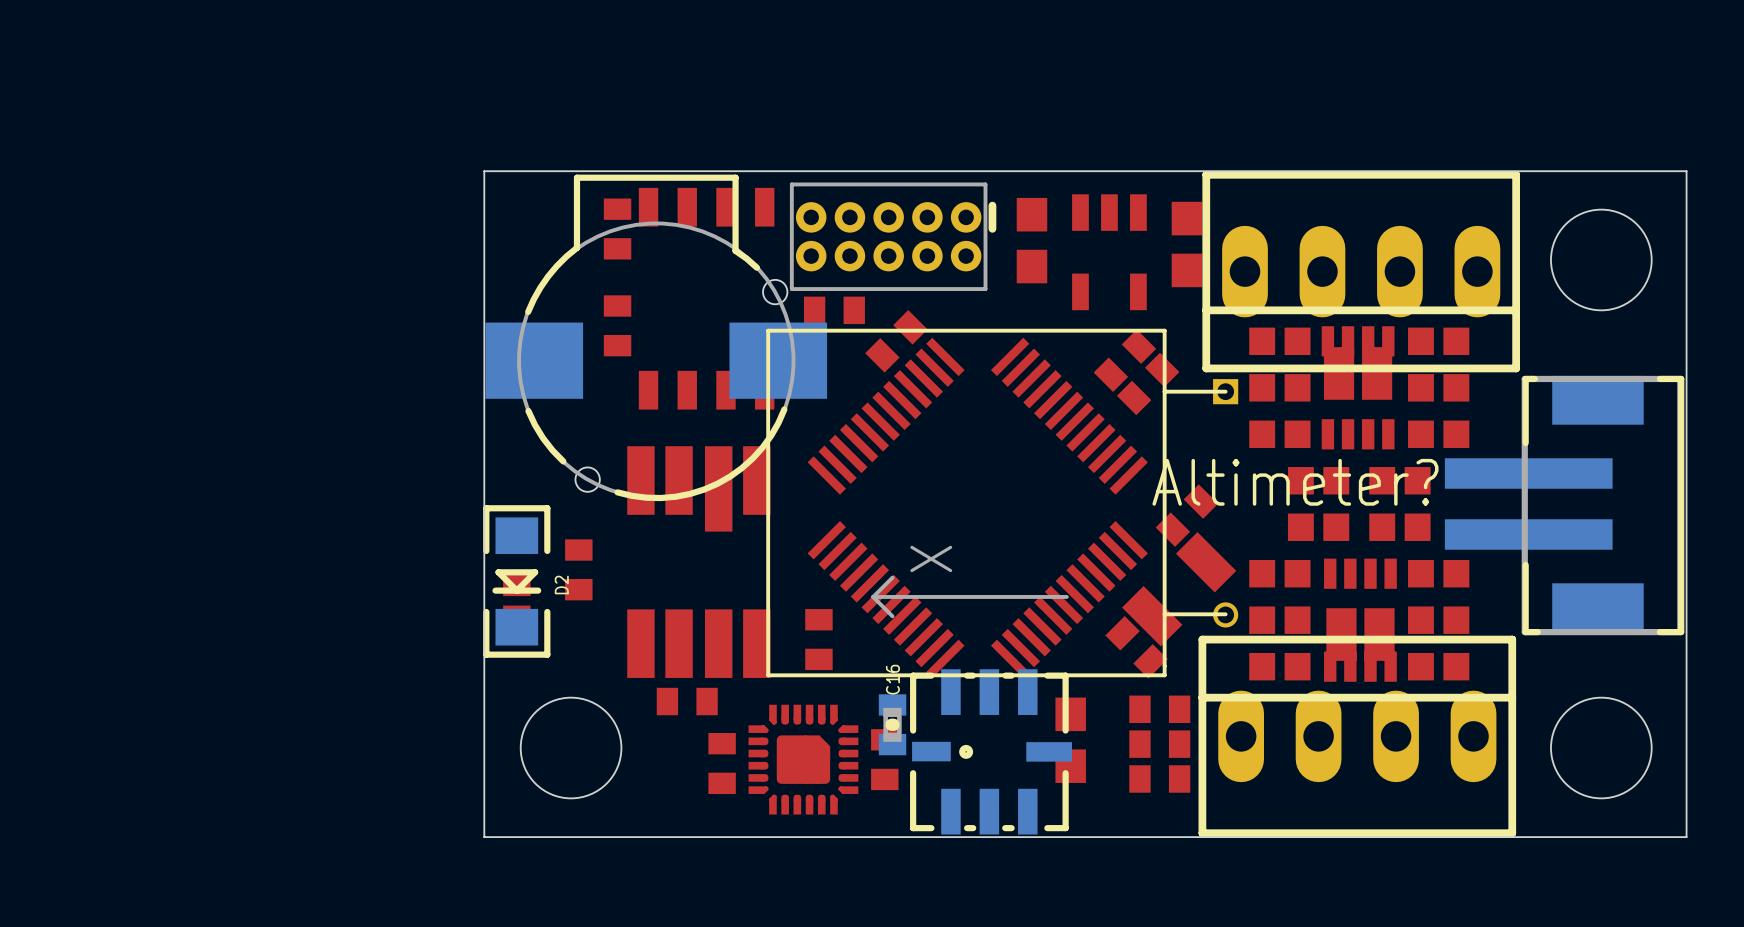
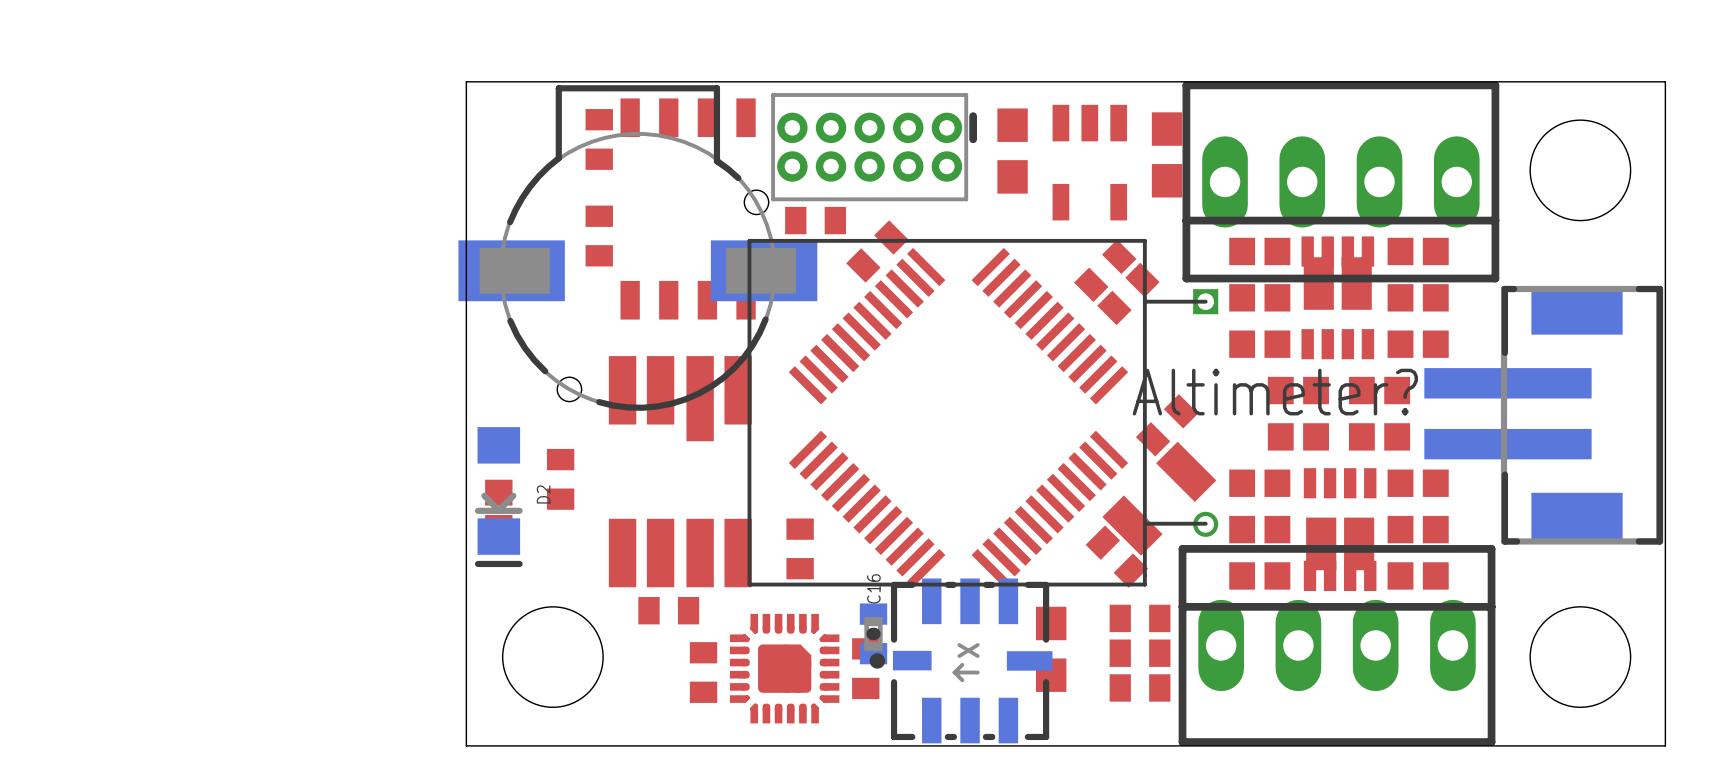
part footprint: [485, 174, 828, 502] -> [458, 85, 818, 411]
D2 footprint: [483, 505, 551, 658] -> [474, 427, 523, 568]
part: (971, 705) -> none
part: none -> (961, 660)

